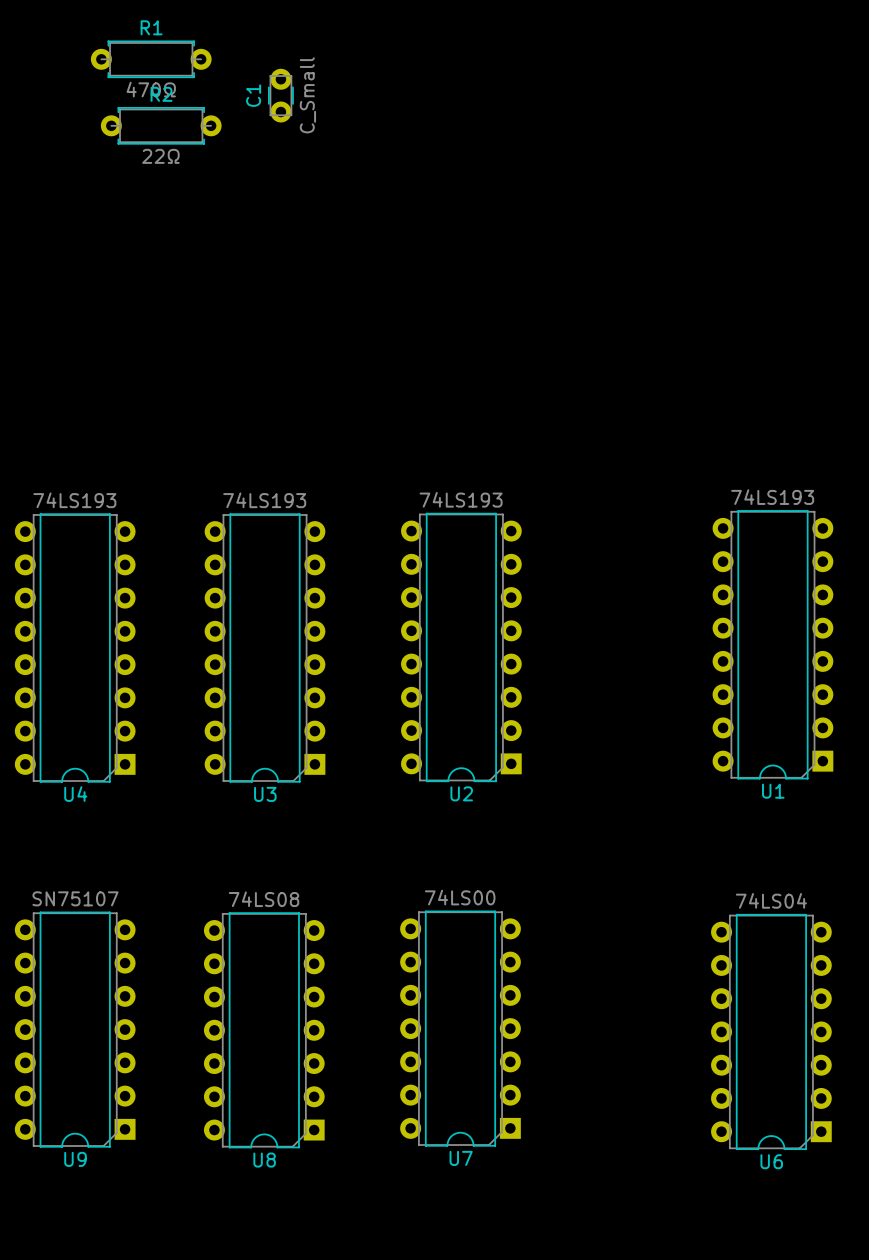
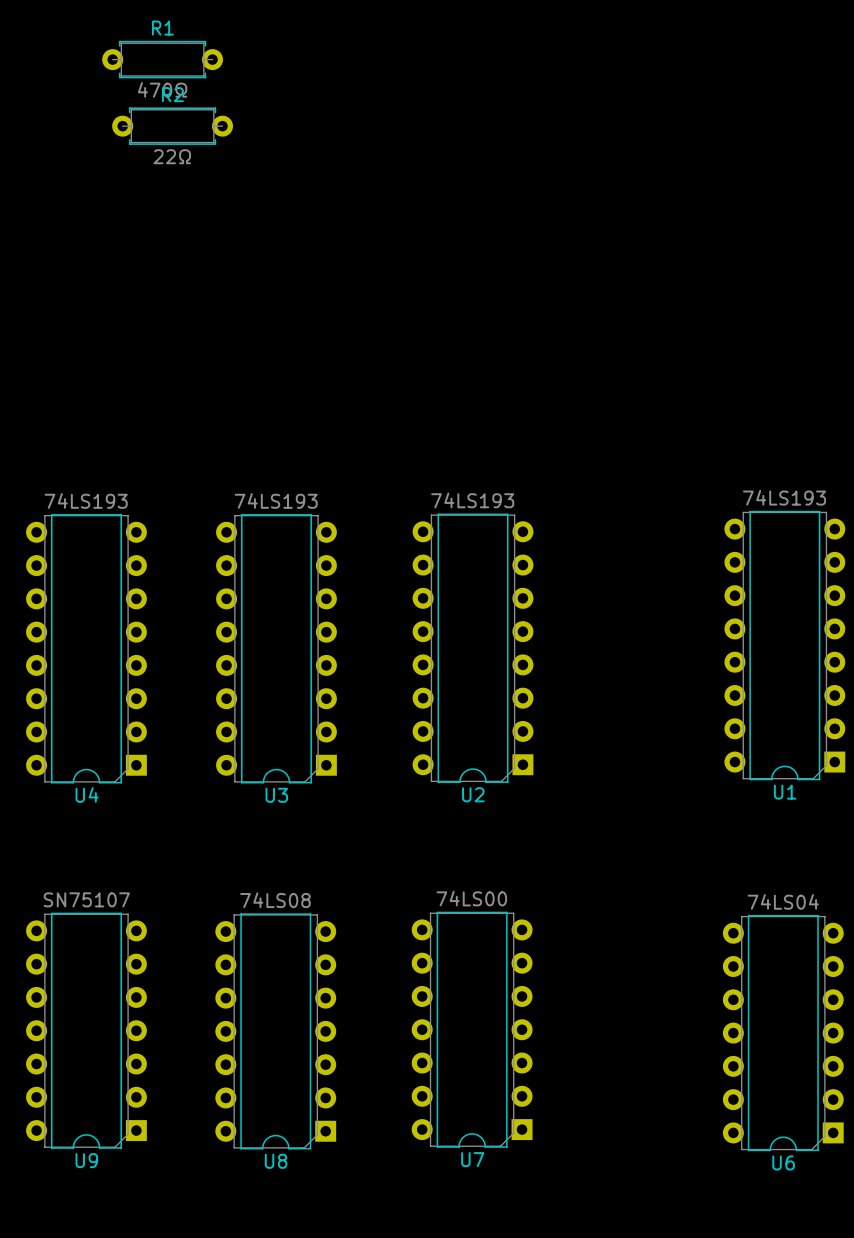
C1: C_Small (280, 95) -> none

